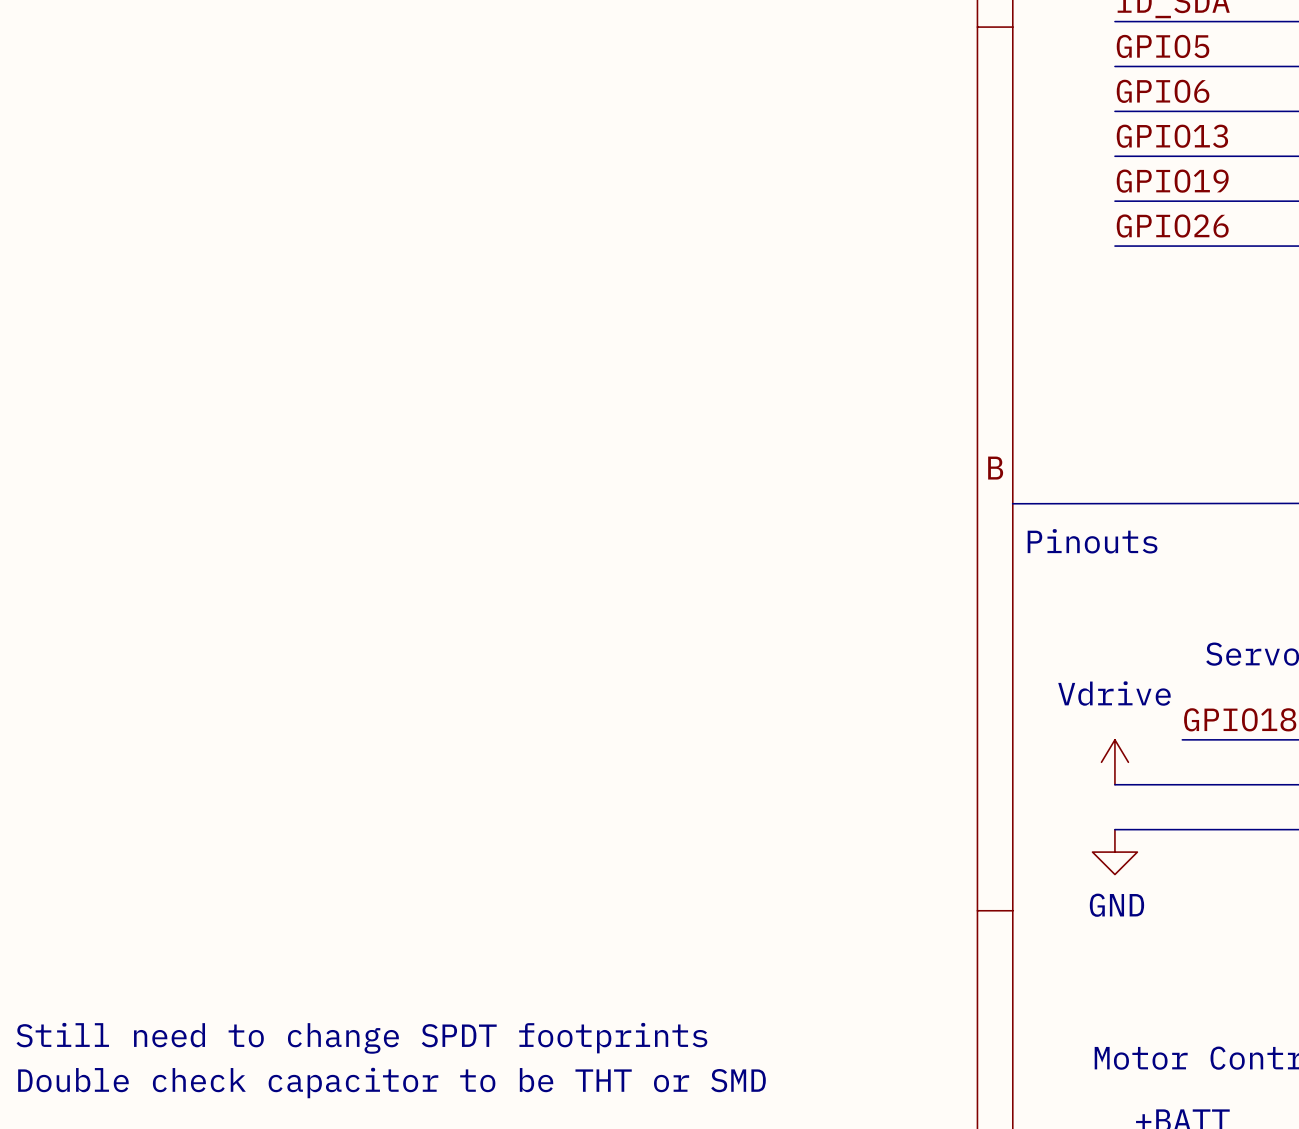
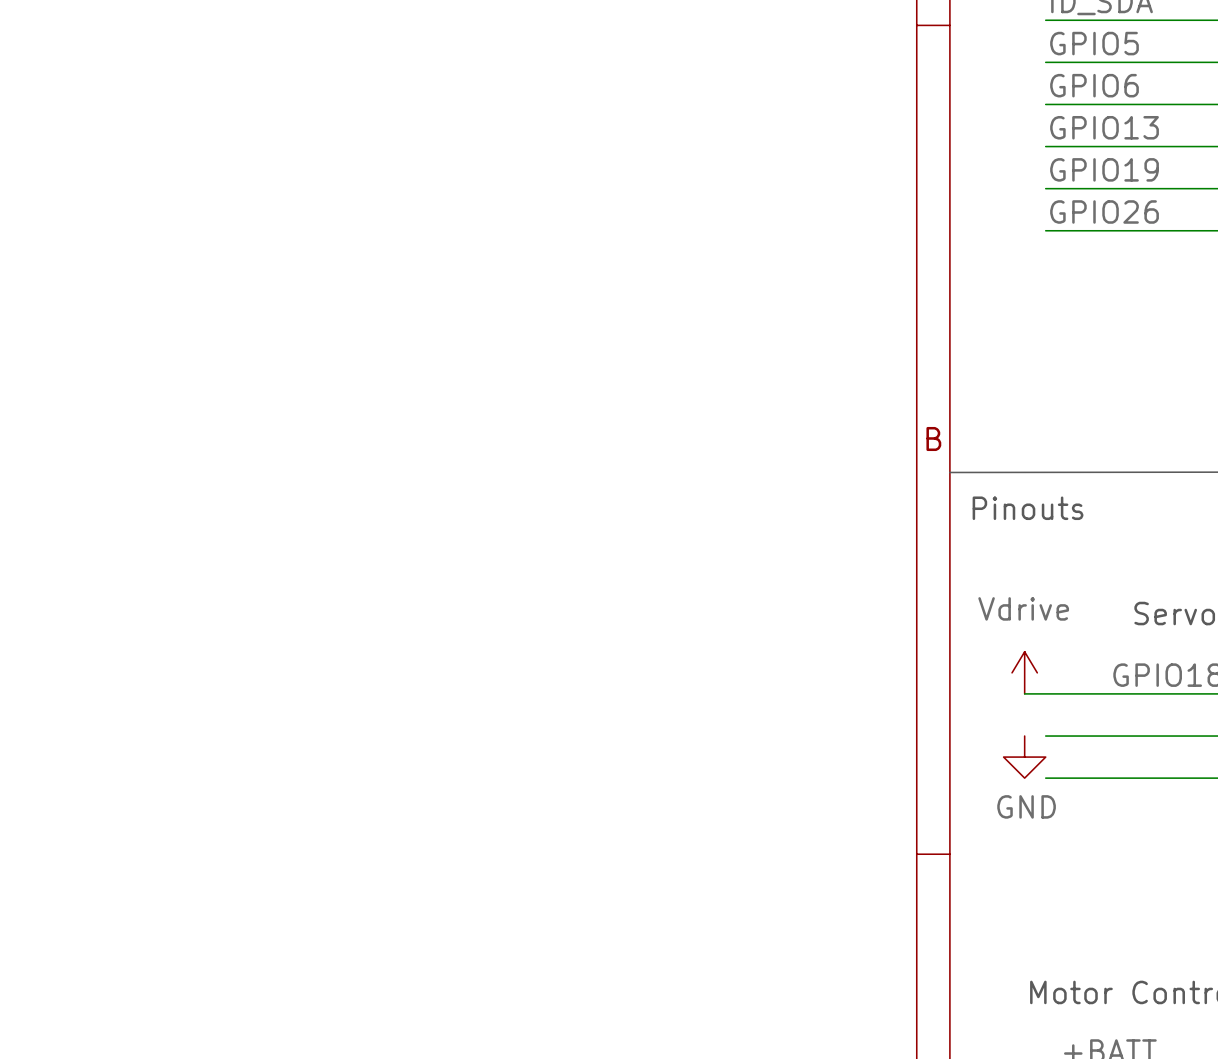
wire: none -> (1024, 693) (1108, 693)
power symbol position: Vdrive (1114, 762) -> Vdrive (1024, 672)
power symbol position: GND (1114, 852) -> GND (1024, 757)
text: Still need to change SPDT footprints (361, 1038) -> none
text: Double check capacitor to be THT or SMD (391, 1083) -> none

